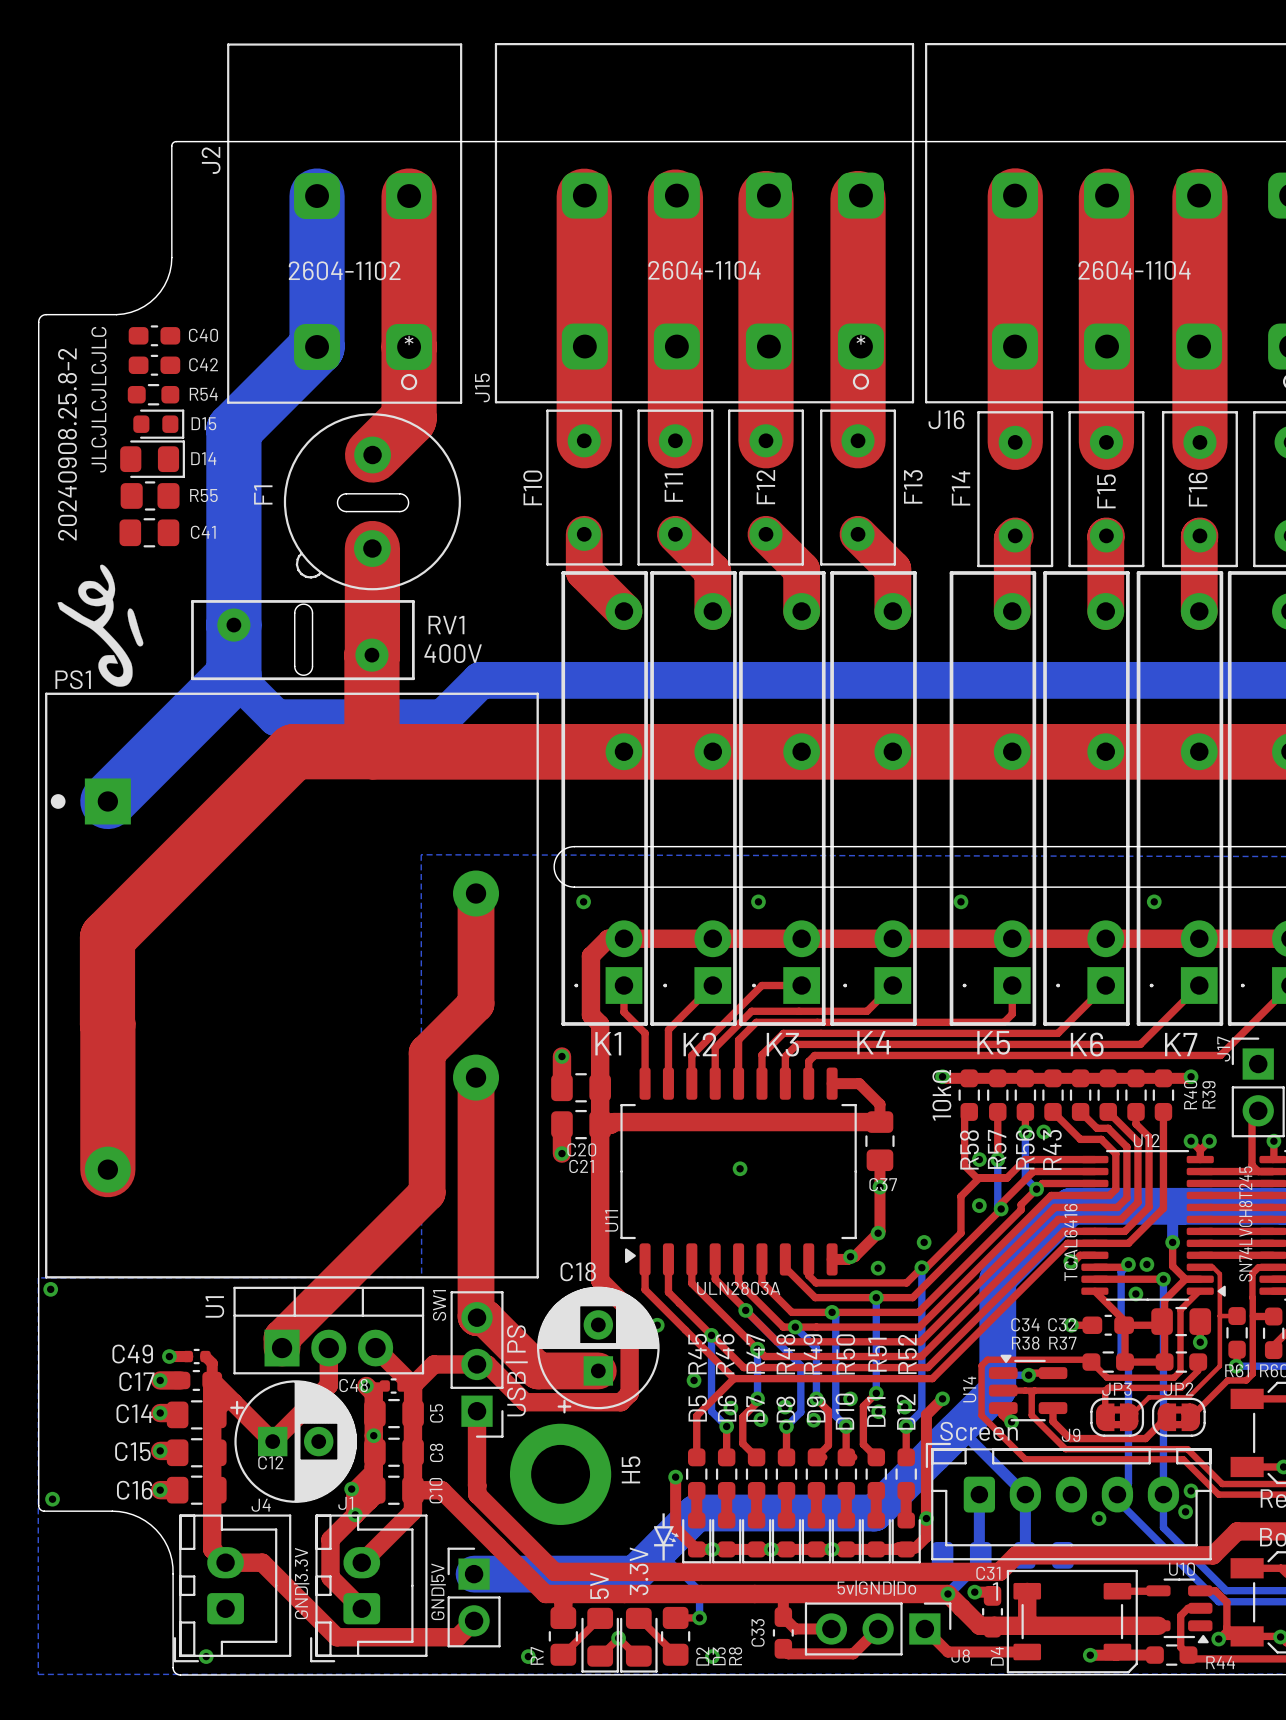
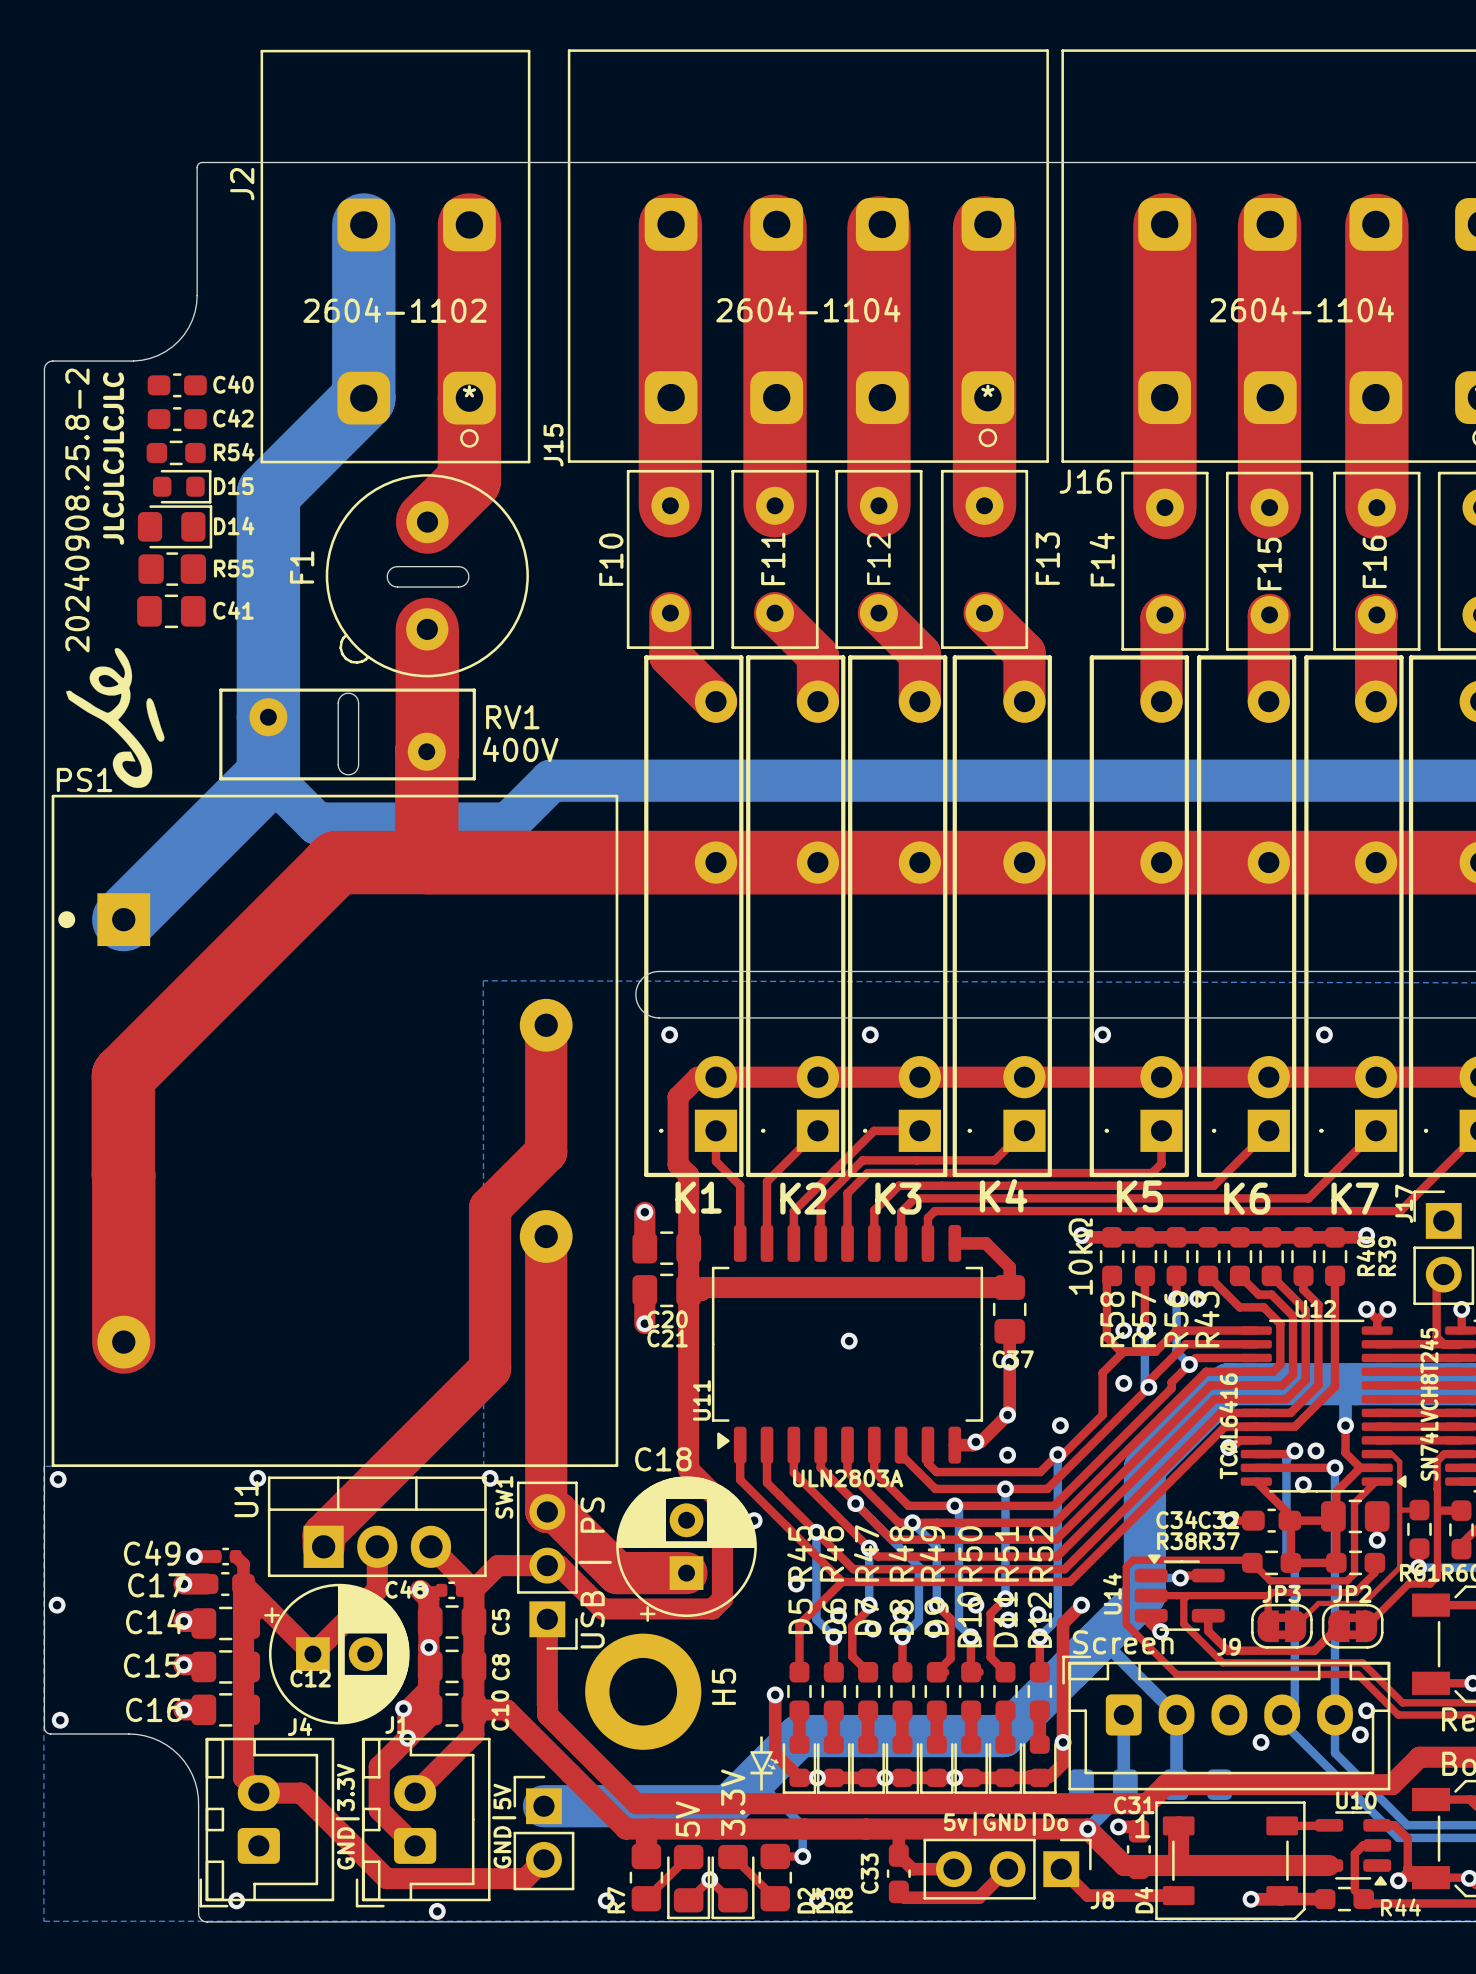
via: none -> (257, 1478)
via: none -> (490, 1478)
via: none -> (57, 1605)
via: none -> (437, 1911)

